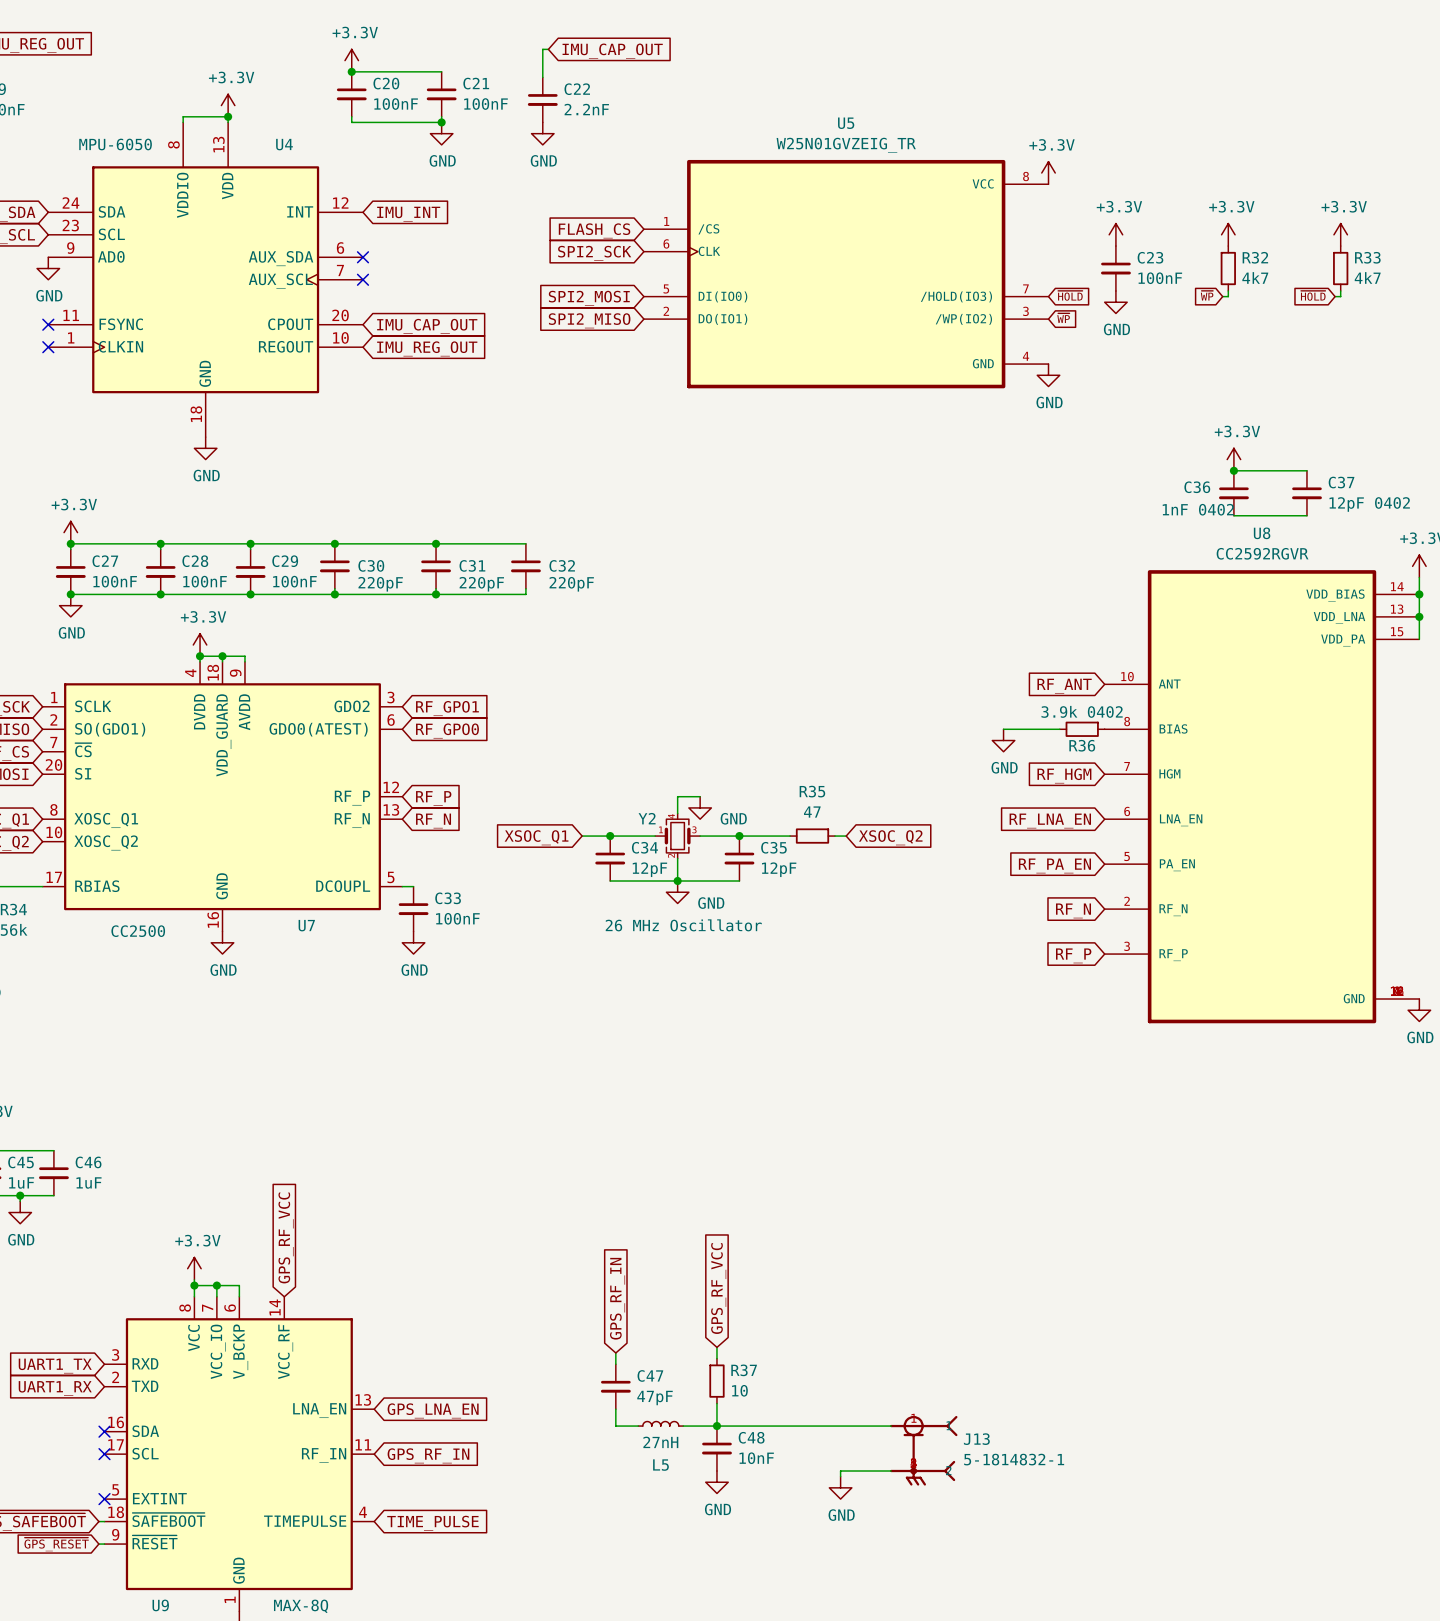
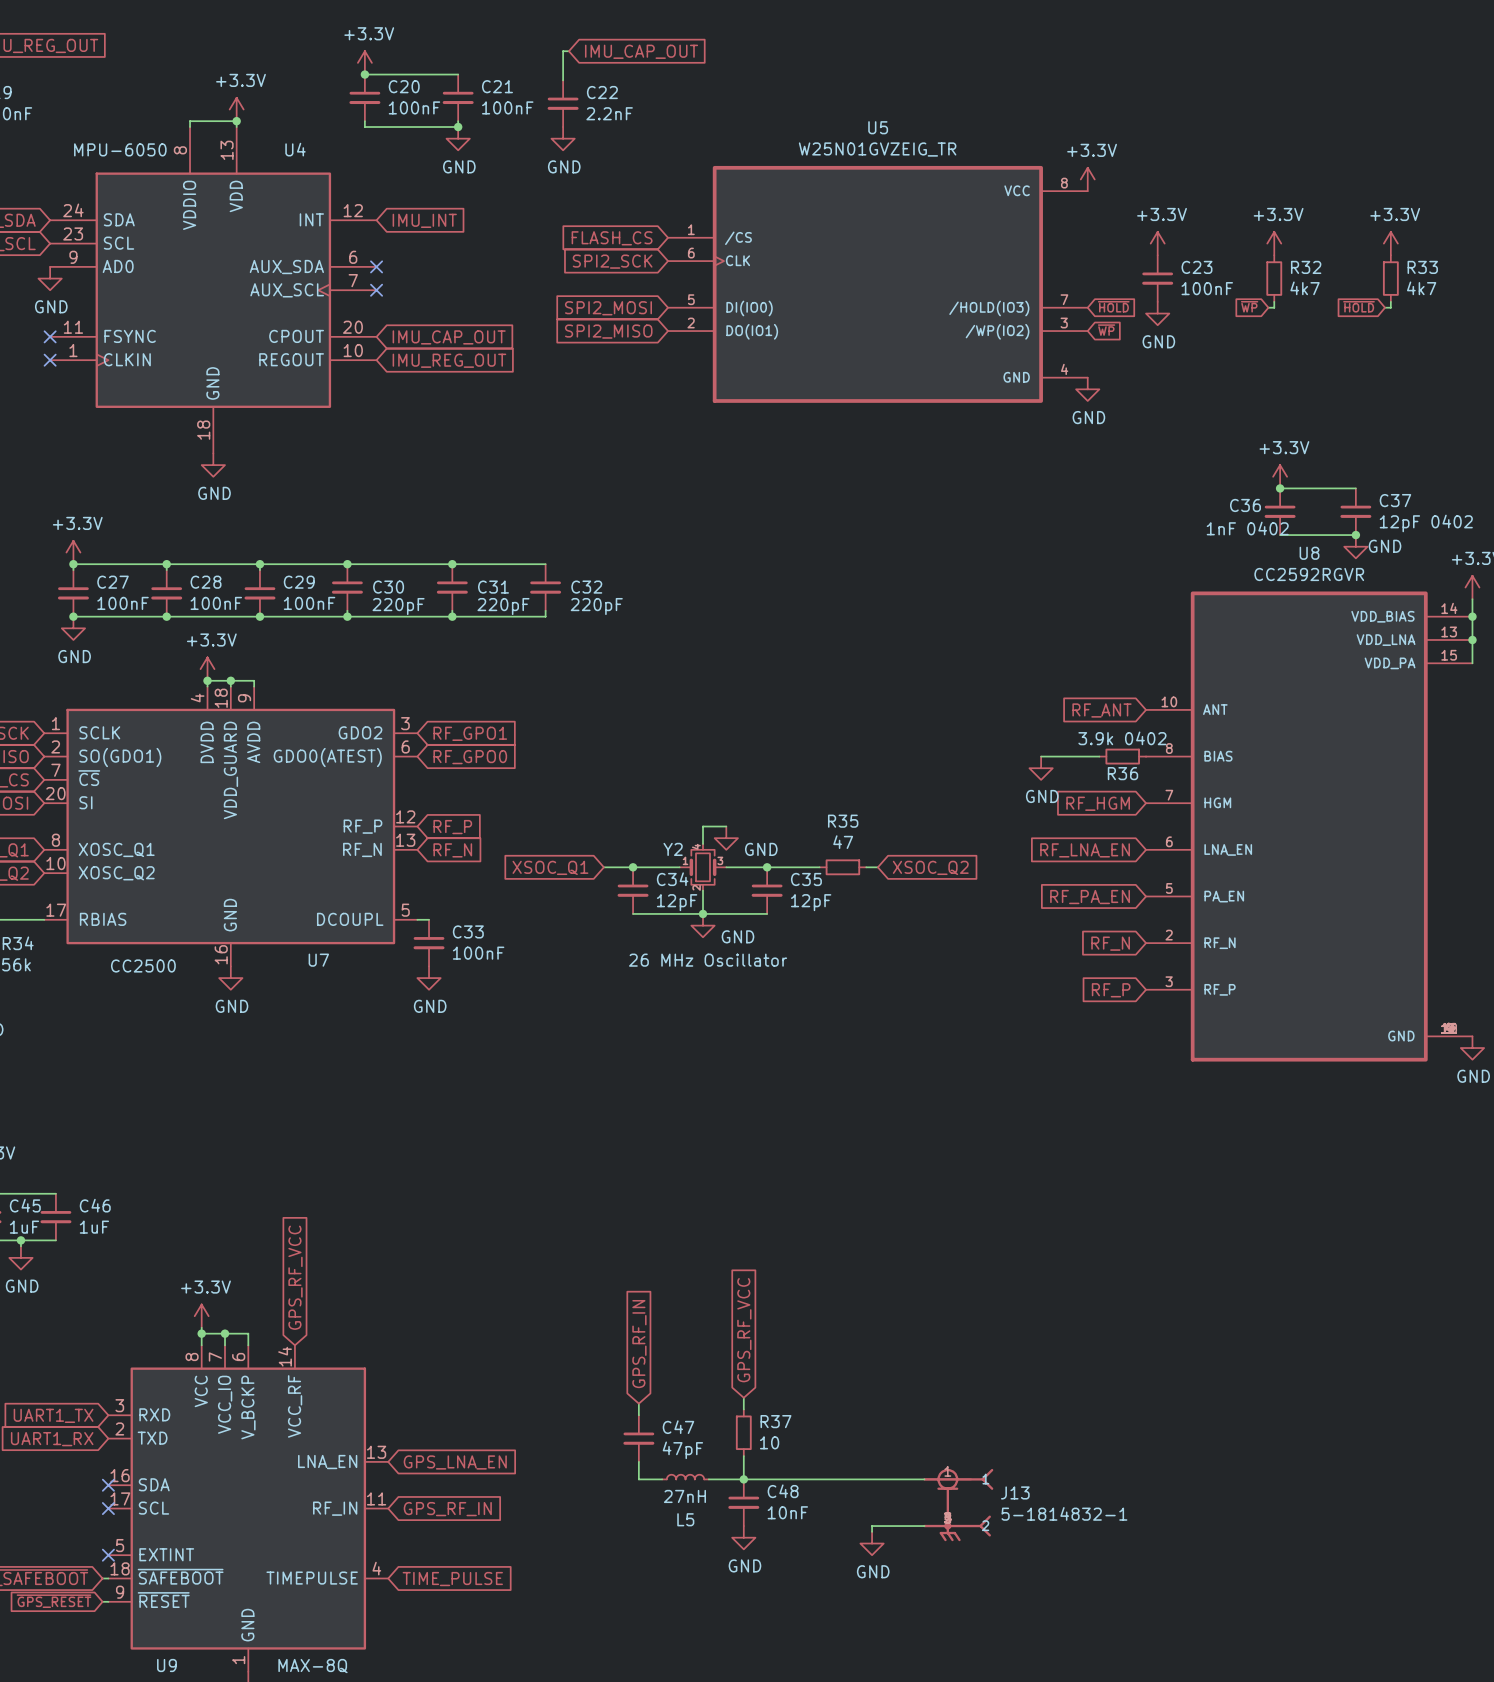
junction: none -> (1355, 535)
power symbol: none -> GND (1355, 546)

